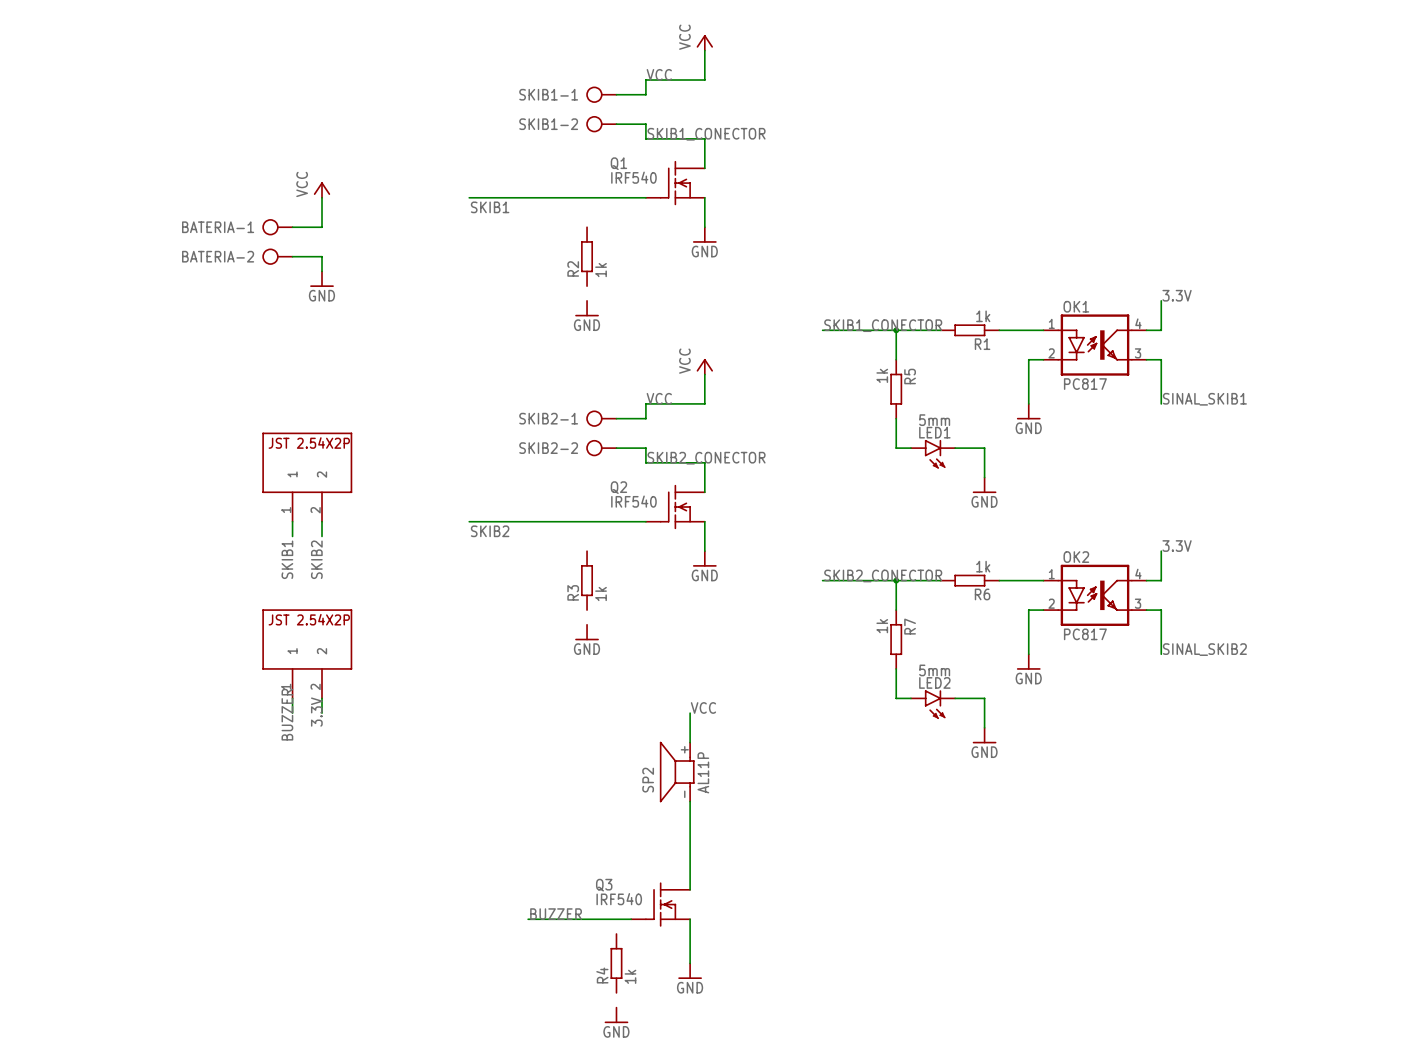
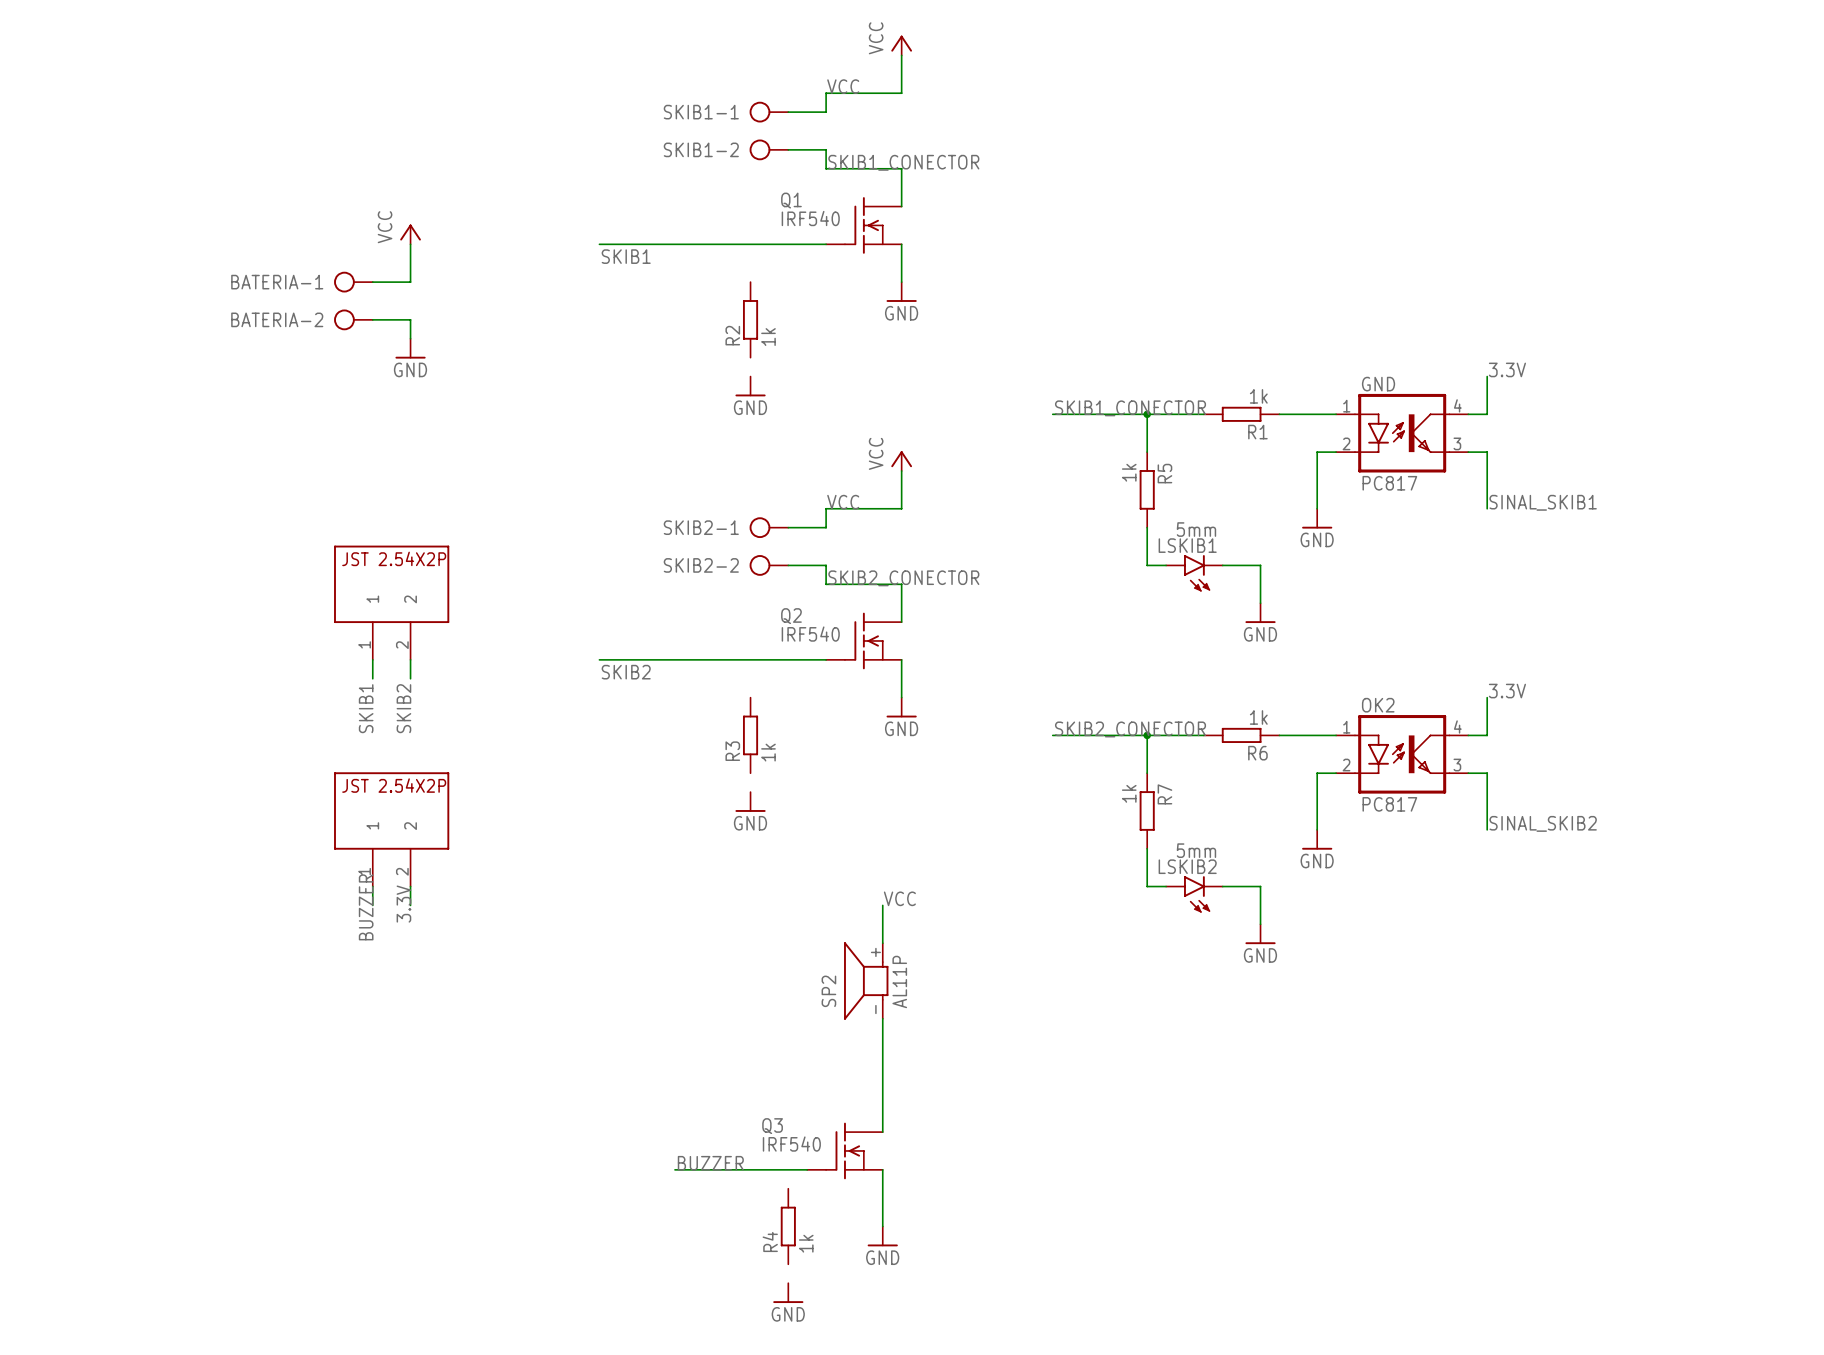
OK1 name: OK1 (1076, 306) -> GND (1378, 384)
LED1 name: LED1 (934, 432) -> LSKIB1 (1187, 545)
LED2 name: LED2 (934, 682) -> LSKIB2 (1187, 866)

